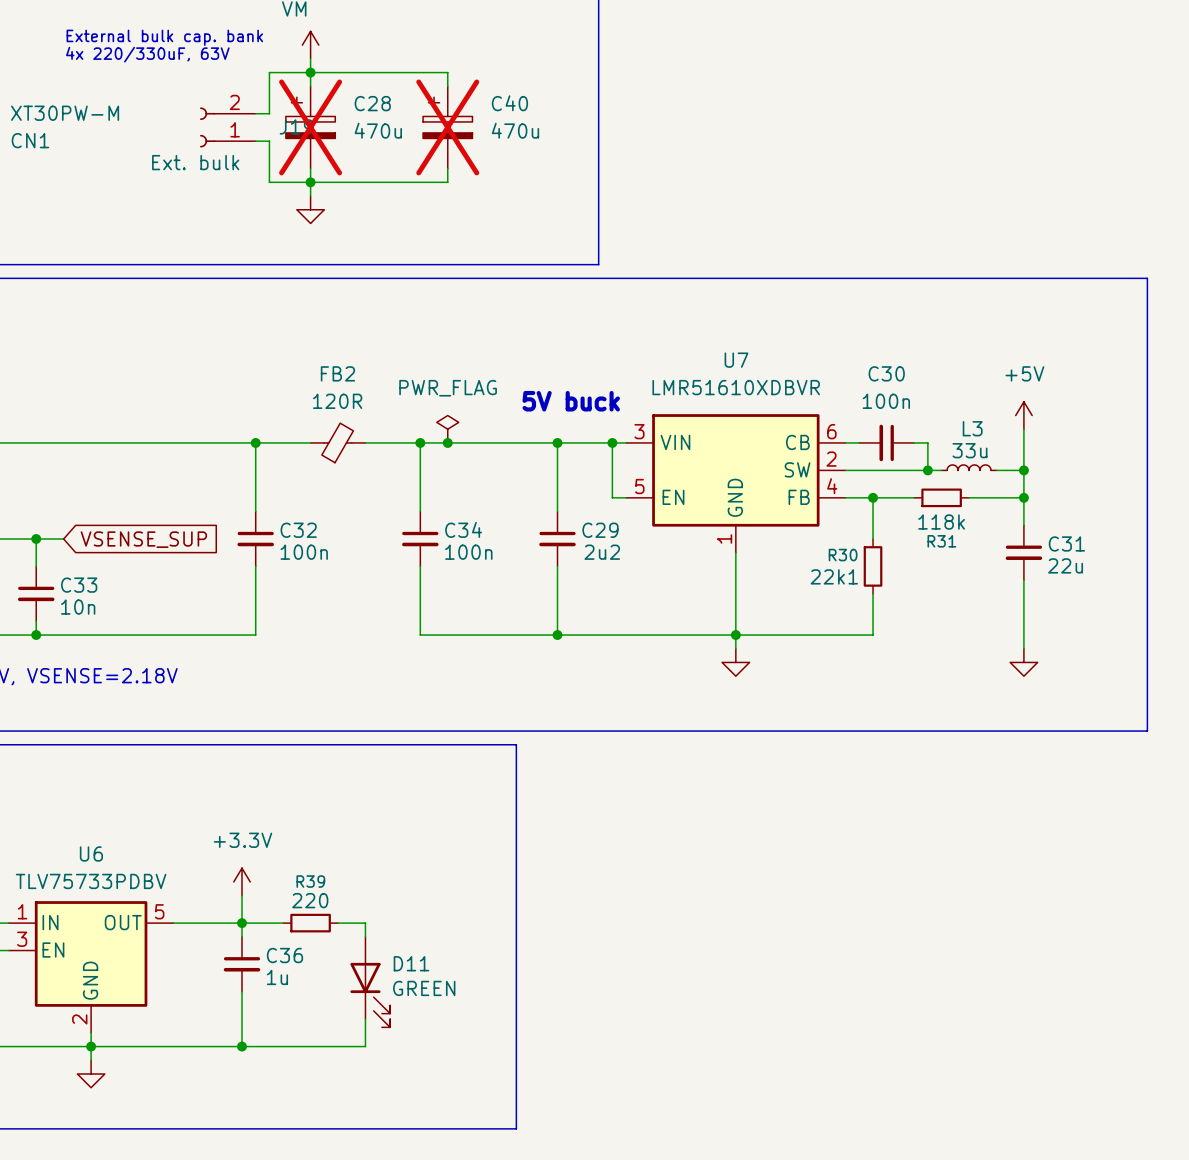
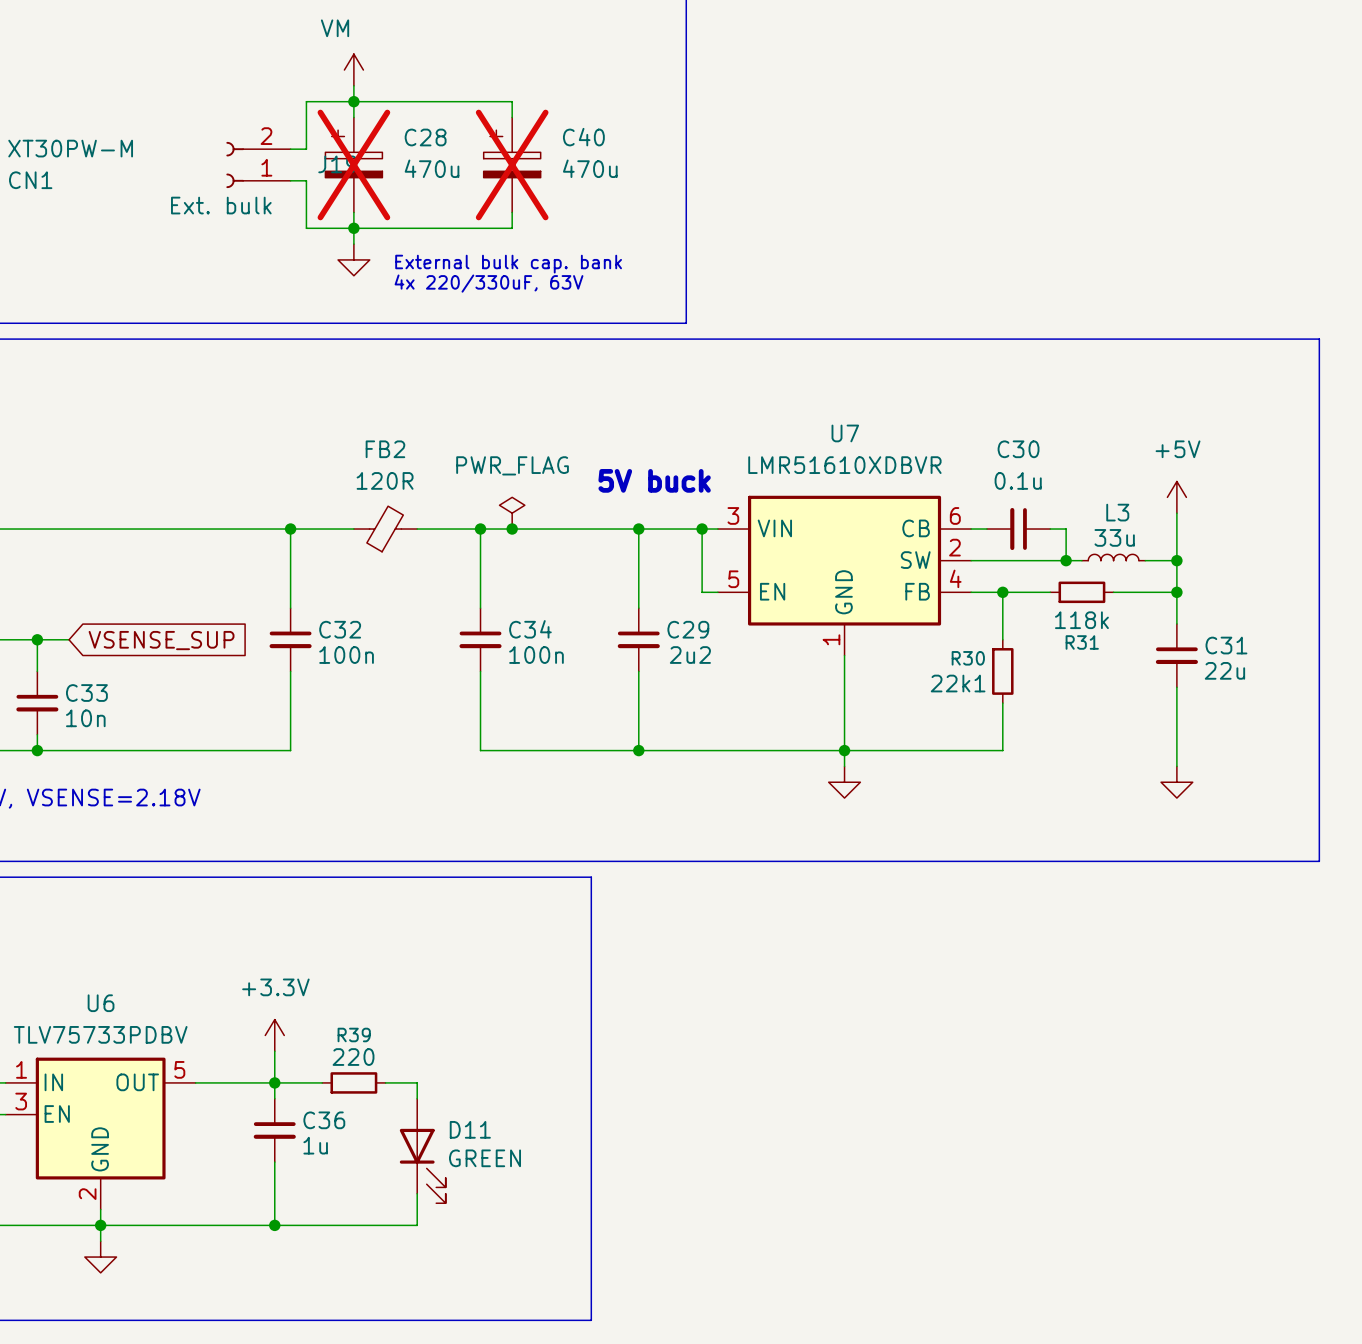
text: External bulk cap. bank (164, 37) -> none
text: 4x 220/330uF, 63V (147, 54) -> none
text: none -> External bulk cap. bank (508, 264)
text: none -> 4x 220/330uF, 63V (489, 283)
C30 value: 100n (886, 401) -> 0.1u (1018, 480)

